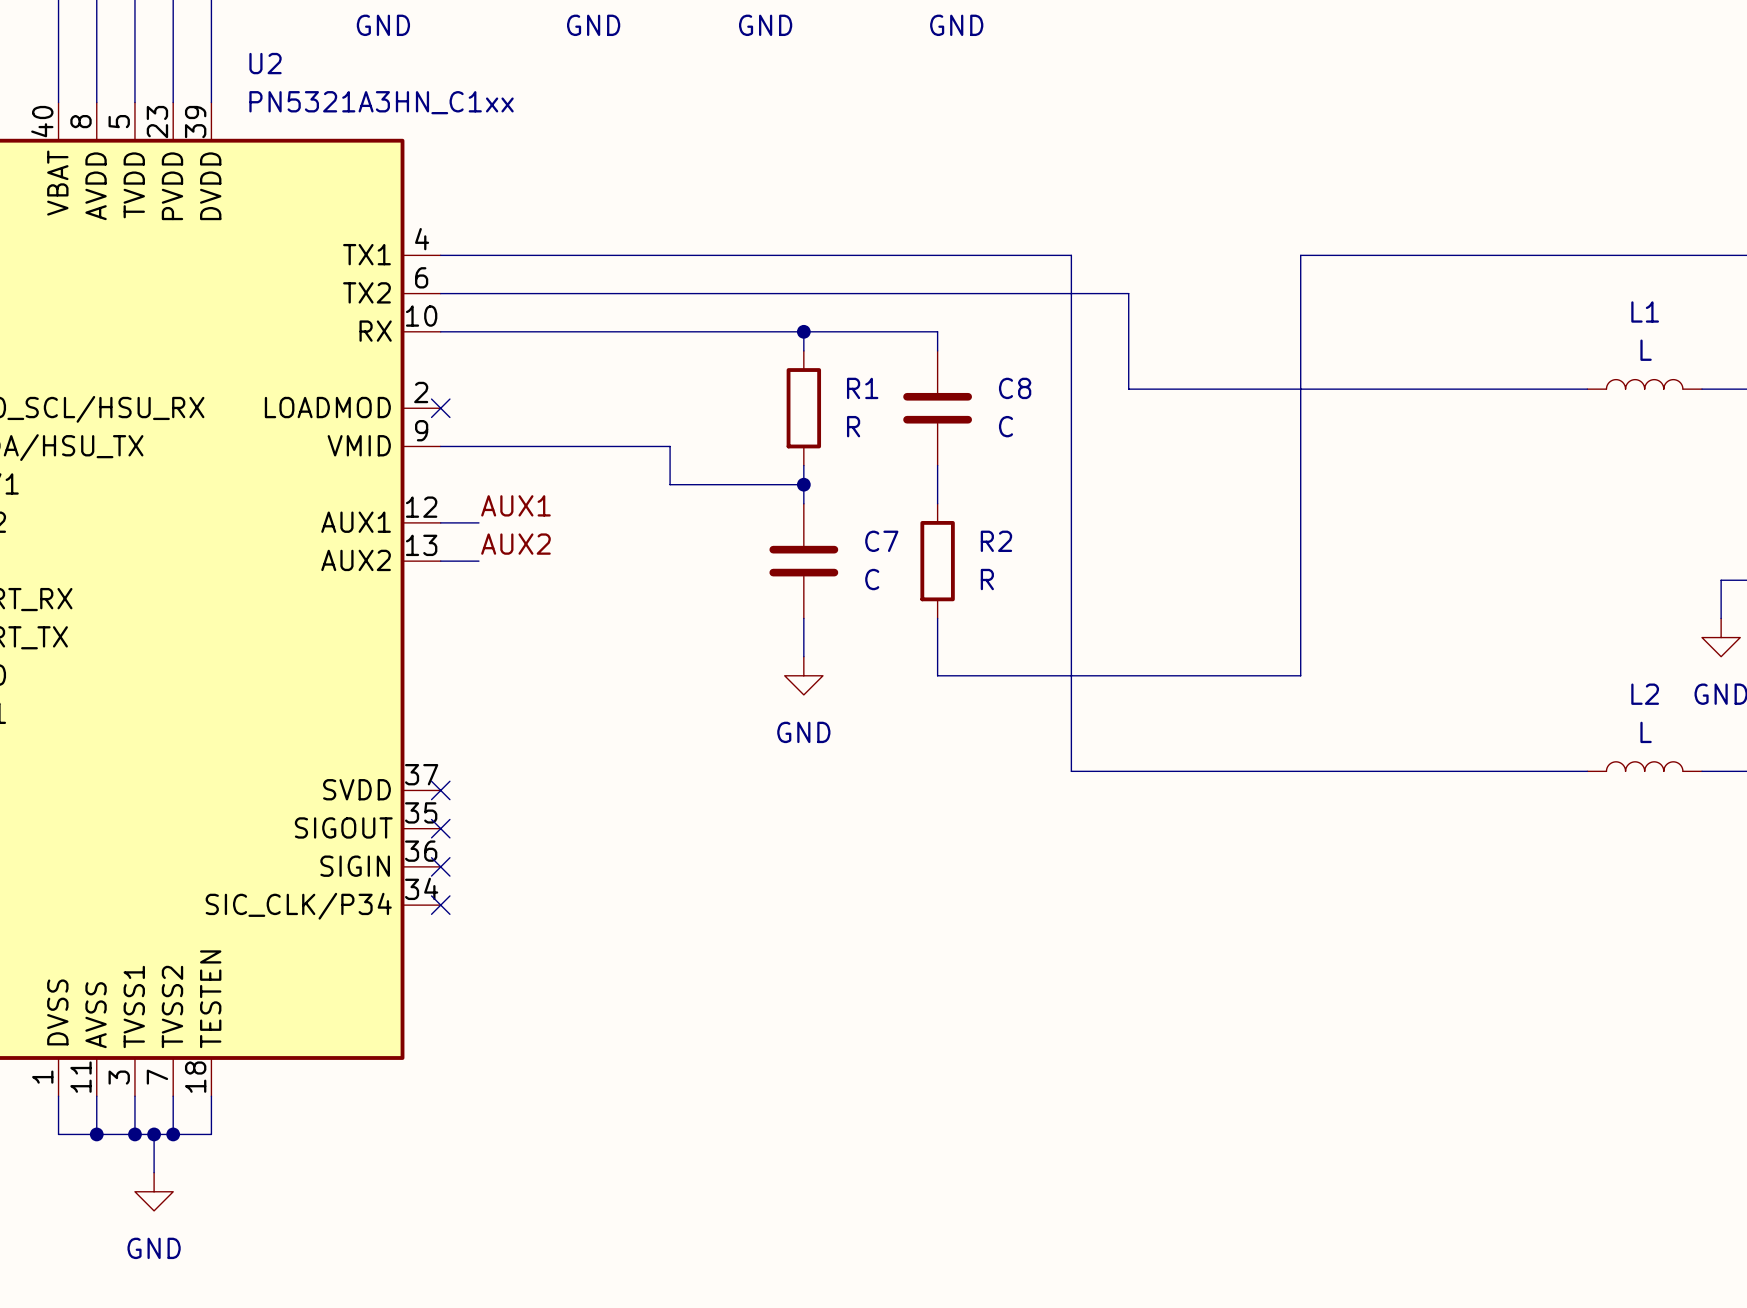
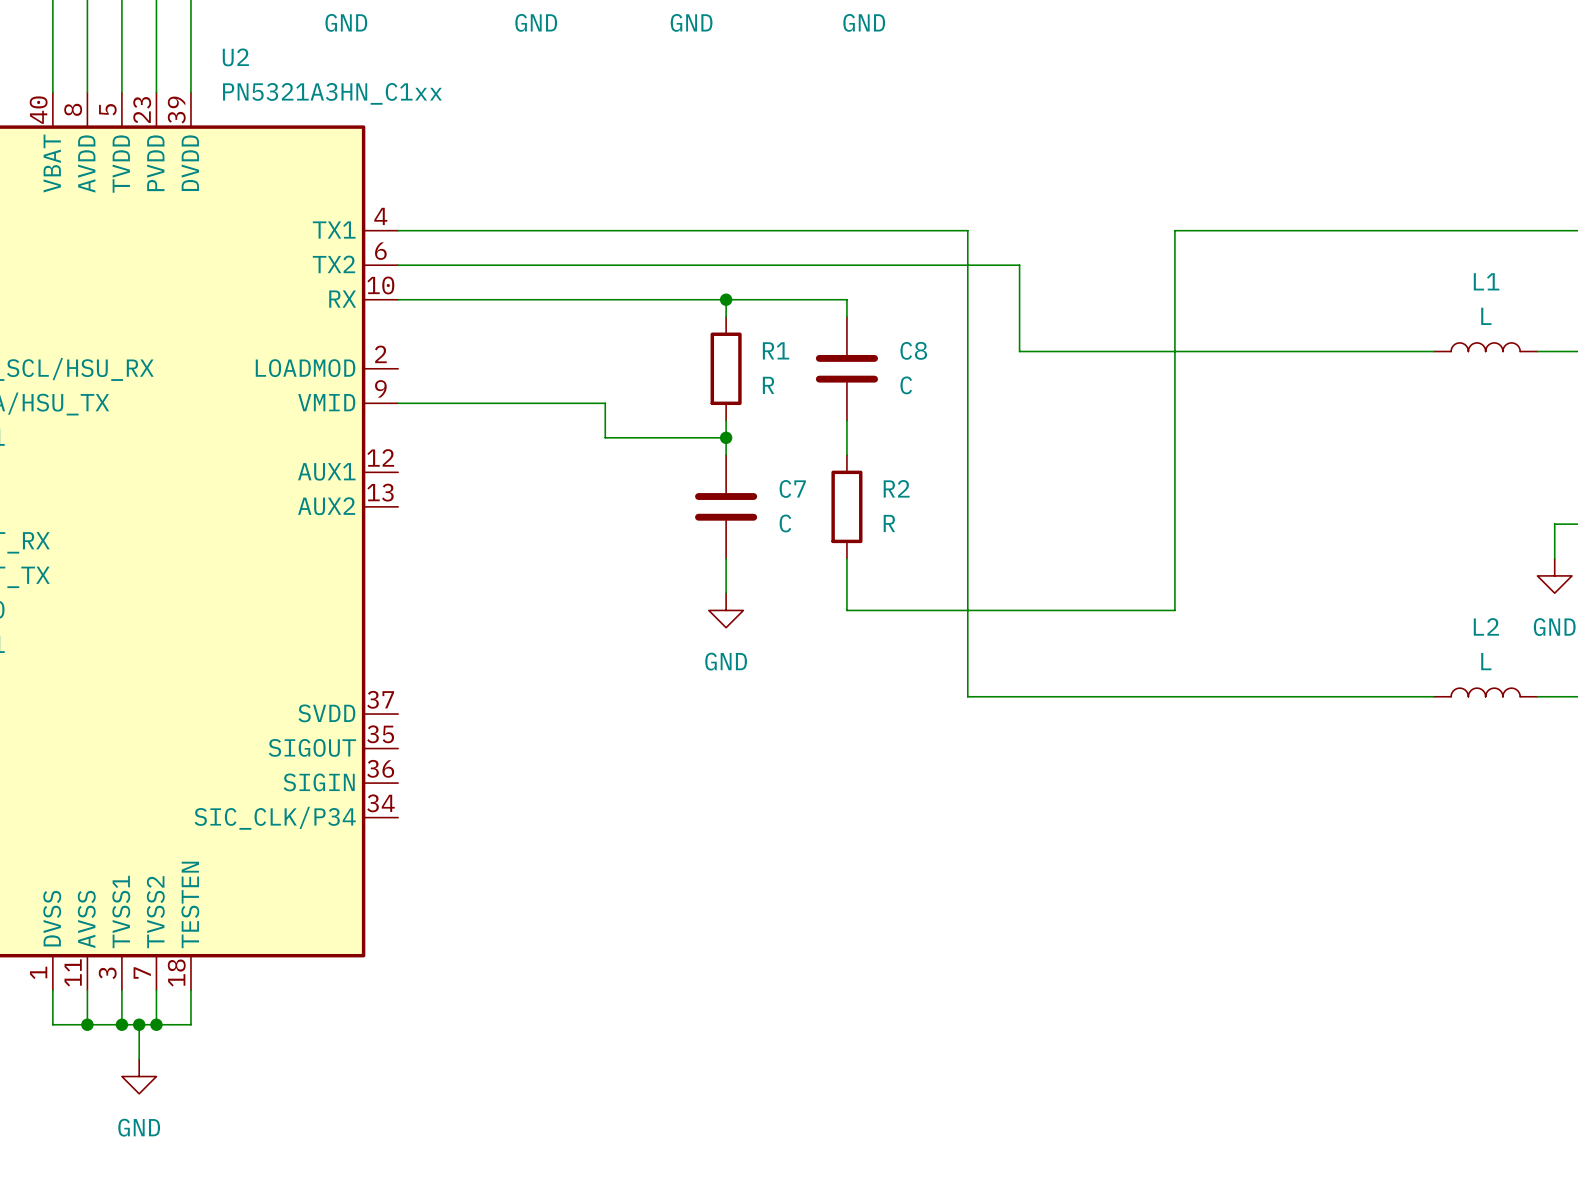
no-connect mark: (440, 408) -> none
label: AUX1 (515, 505) -> none
wire: (440, 522) (478, 522) -> none
label: AUX2 (515, 544) -> none
wire: (440, 561) (478, 561) -> none
no-connect mark: (440, 790) -> none
no-connect mark: (440, 828) -> none
no-connect mark: (440, 866) -> none
no-connect mark: (440, 905) -> none

